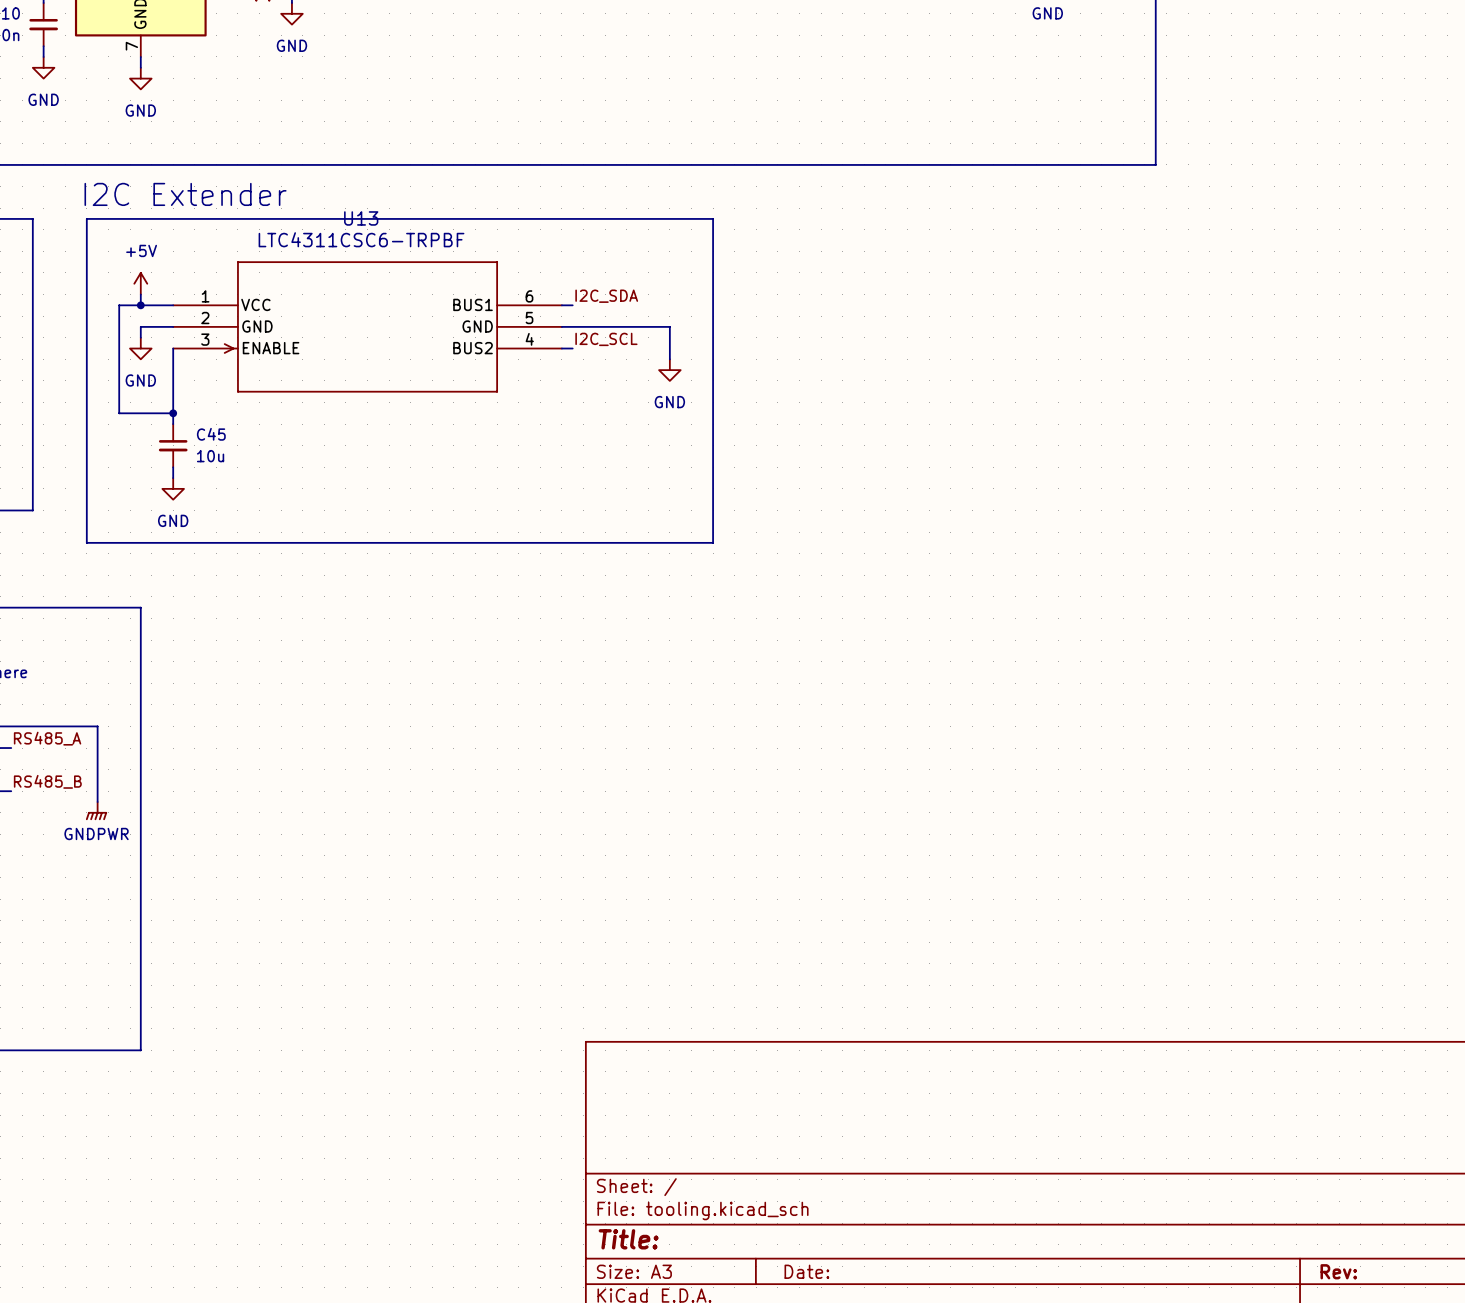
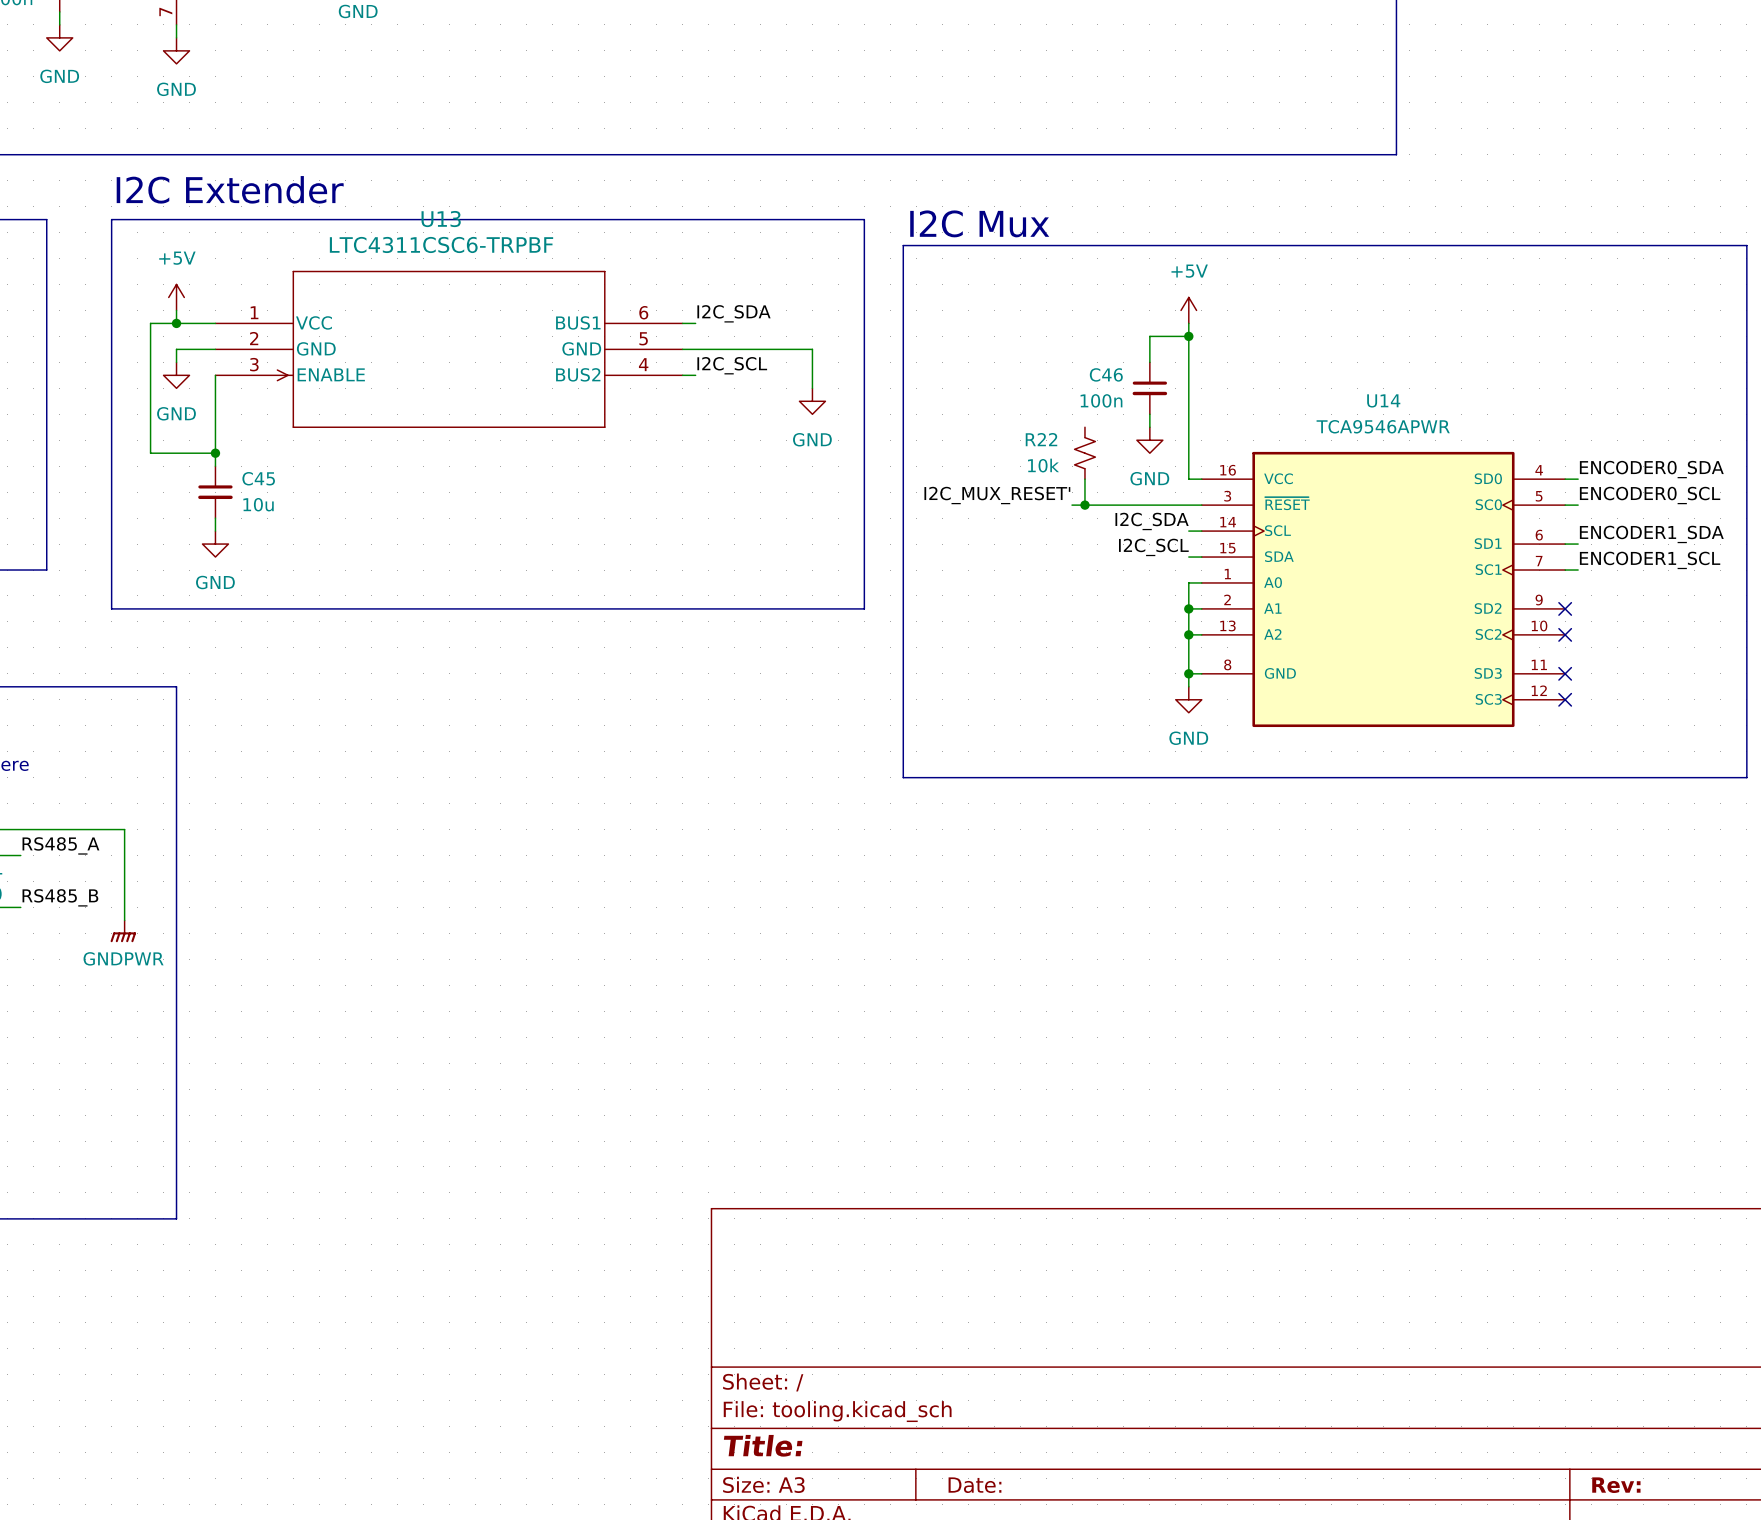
text: none -> I2C Mux (979, 223)
line: none -> (903, 245) (1746, 245) (1746, 777) (903, 777) (903, 245)
power symbol: none -> +5V (1188, 310)
wire: none -> (1188, 323) (1188, 479) (1201, 479)
wire: none -> (1188, 336) (1149, 336) (1149, 362)
junction: none -> (1188, 336)
C46: none -> 100n (1149, 388)
wire: none -> (1149, 414) (1149, 427)
power symbol: none -> GND (1149, 440)
R22: none -> 10k (1084, 453)
label: none -> ENCODER0_SDA (1651, 469)
wire: none -> (1084, 479) (1084, 505)
wire: none -> (1565, 479) (1578, 479)
label: none -> I2C_MUX_RESET' (997, 495)
label: none -> ENCODER0_SCL (1650, 495)
wire: none -> (1072, 505) (1201, 505)
junction: none -> (1084, 505)
wire: none -> (1565, 505) (1578, 505)
label: none -> I2C_SDA (1152, 521)
wire: none -> (1188, 531) (1201, 531)
label: none -> ENCODER1_SDA (1651, 534)
wire: none -> (1565, 544) (1578, 544)
label: none -> I2C_SCL (1153, 547)
wire: none -> (1188, 557) (1201, 557)
label: none -> ENCODER1_SCL (1650, 560)
wire: none -> (1565, 570) (1578, 570)
wire: none -> (1201, 582) (1188, 582) (1188, 686)
U14: none -> TCA9546APWR (1383, 589)
wire: none -> (1188, 608) (1201, 608)
junction: none -> (1188, 608)
no-connect mark: none -> (1565, 608)
wire: none -> (1188, 634) (1201, 634)
junction: none -> (1188, 634)
no-connect mark: none -> (1565, 634)
wire: none -> (1188, 673) (1201, 673)
junction: none -> (1188, 673)
no-connect mark: none -> (1565, 673)
power symbol: none -> GND (1188, 699)
no-connect mark: none -> (1565, 699)

